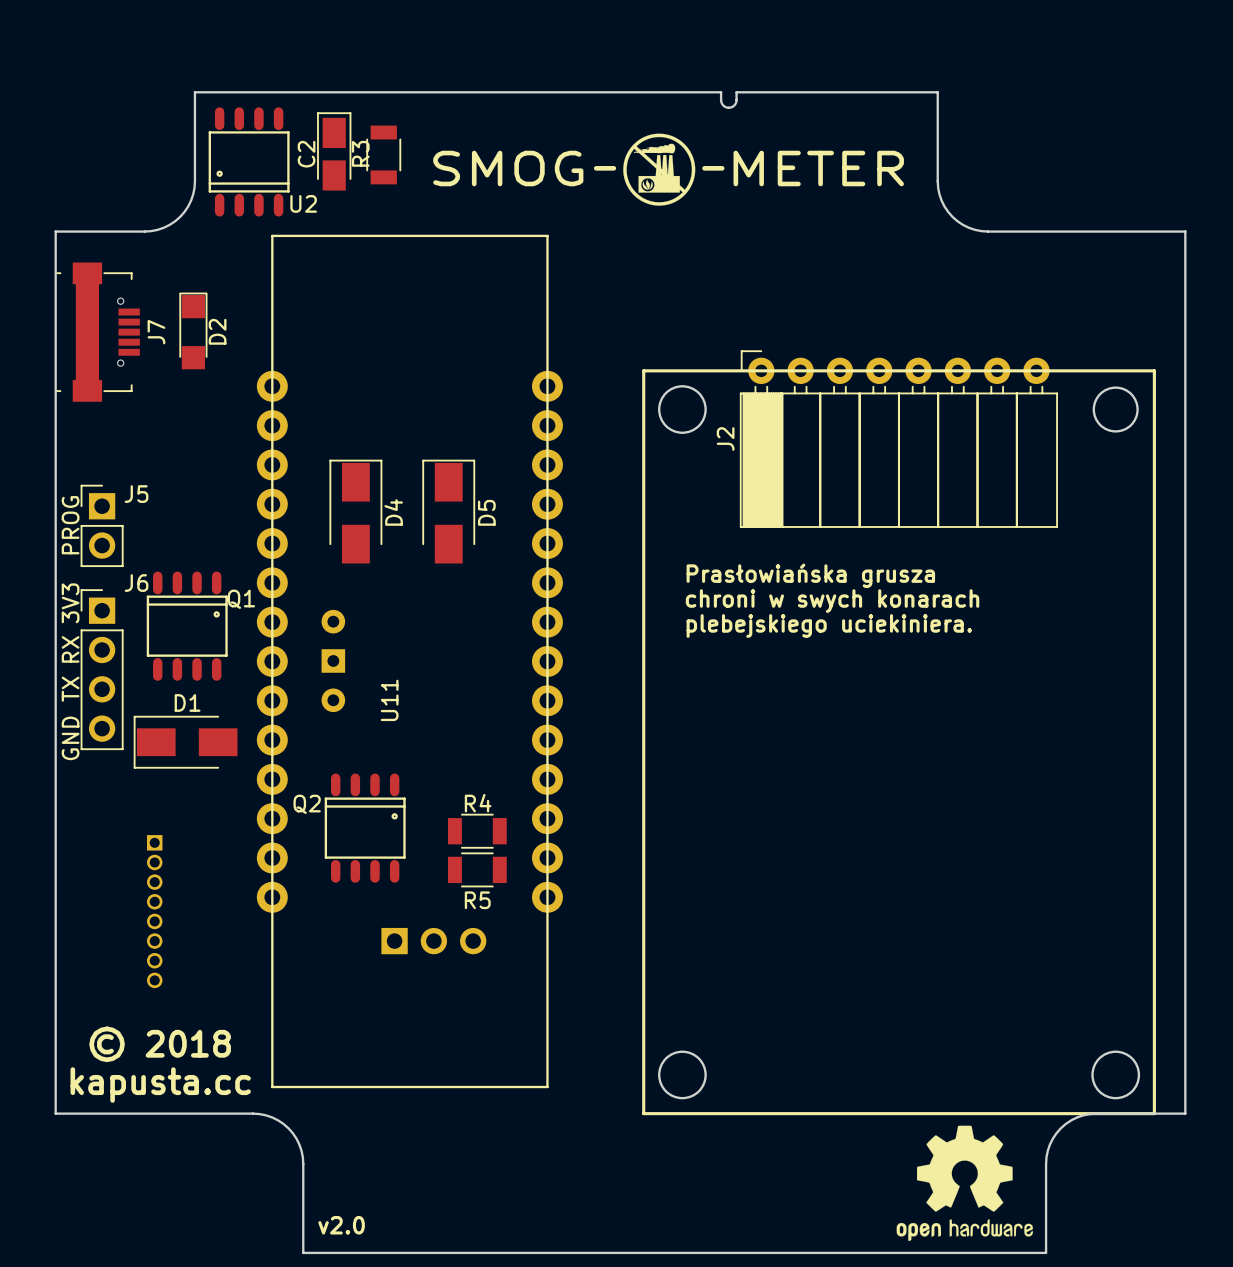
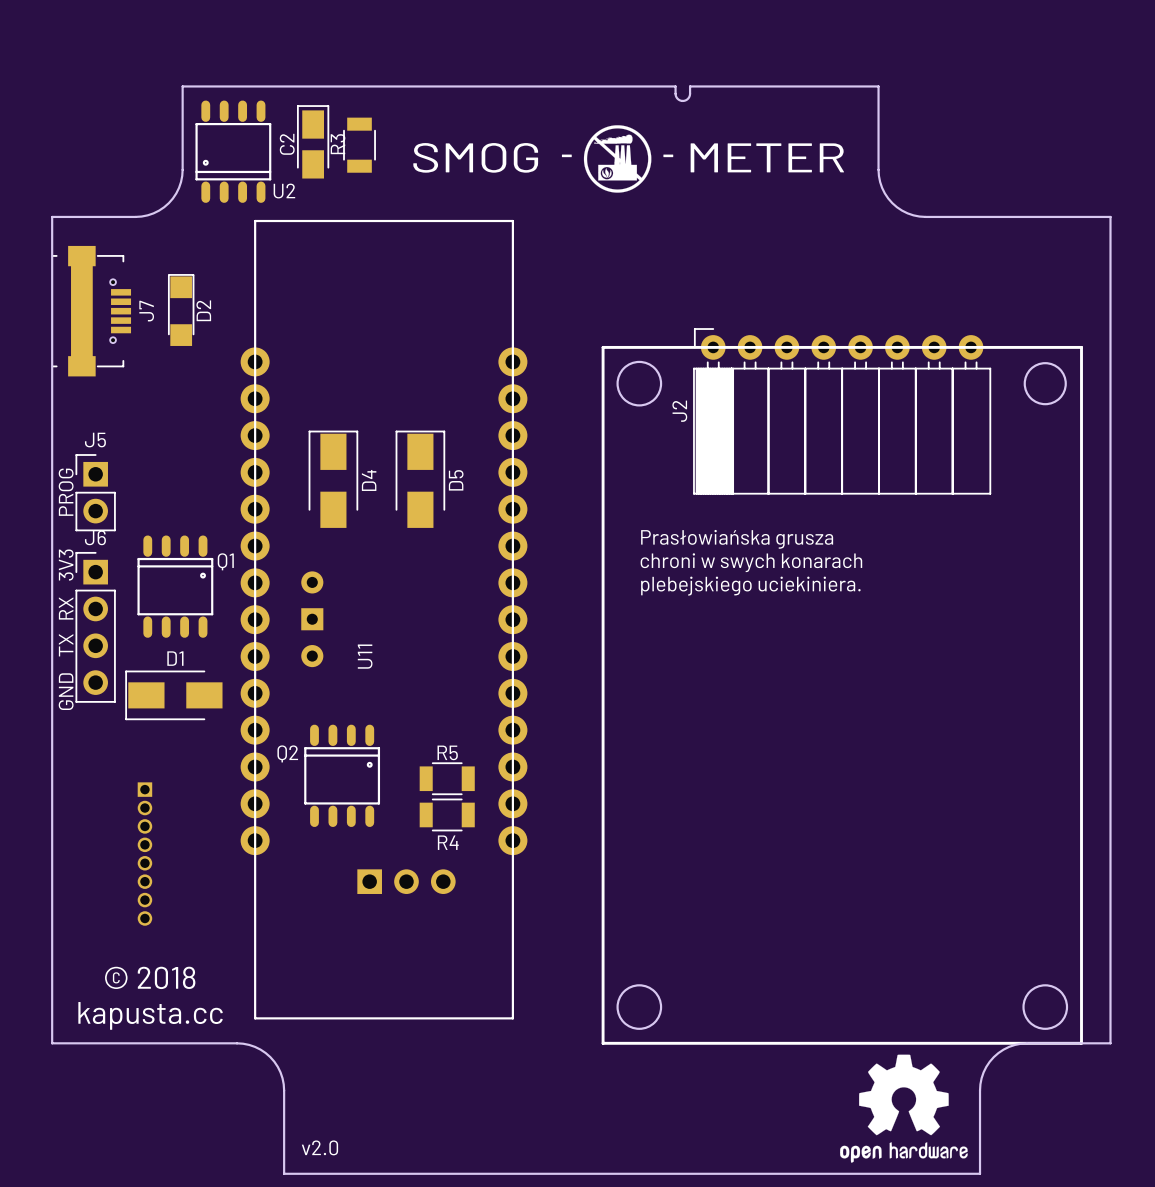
J5 name position: J5 (136, 494) -> J5 (95, 440)
J6 name position: J6 (136, 583) -> J6 (95, 537)
R4 name position: R4 (478, 803) -> R4 (448, 842)
R5 name position: R5 (477, 900) -> R5 (447, 752)

